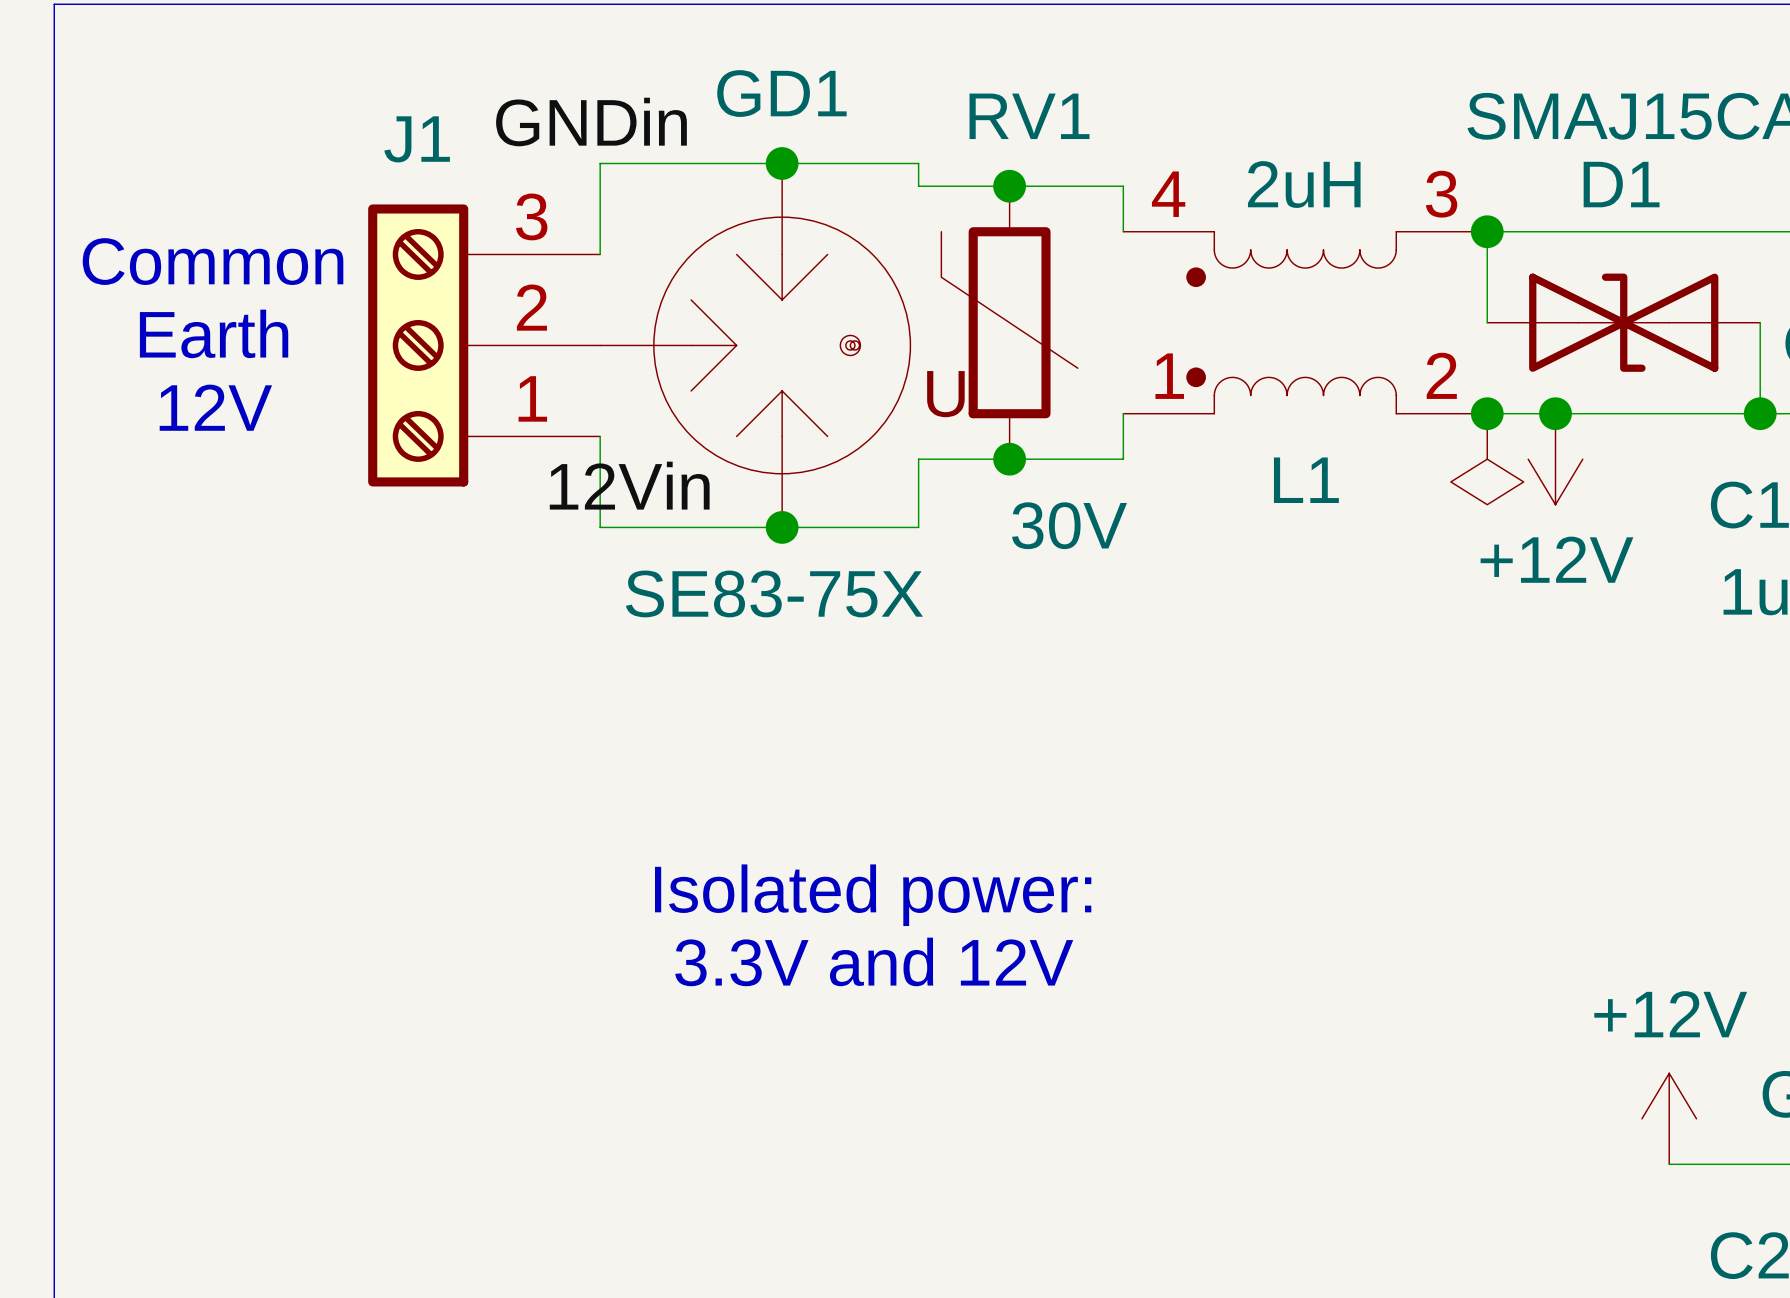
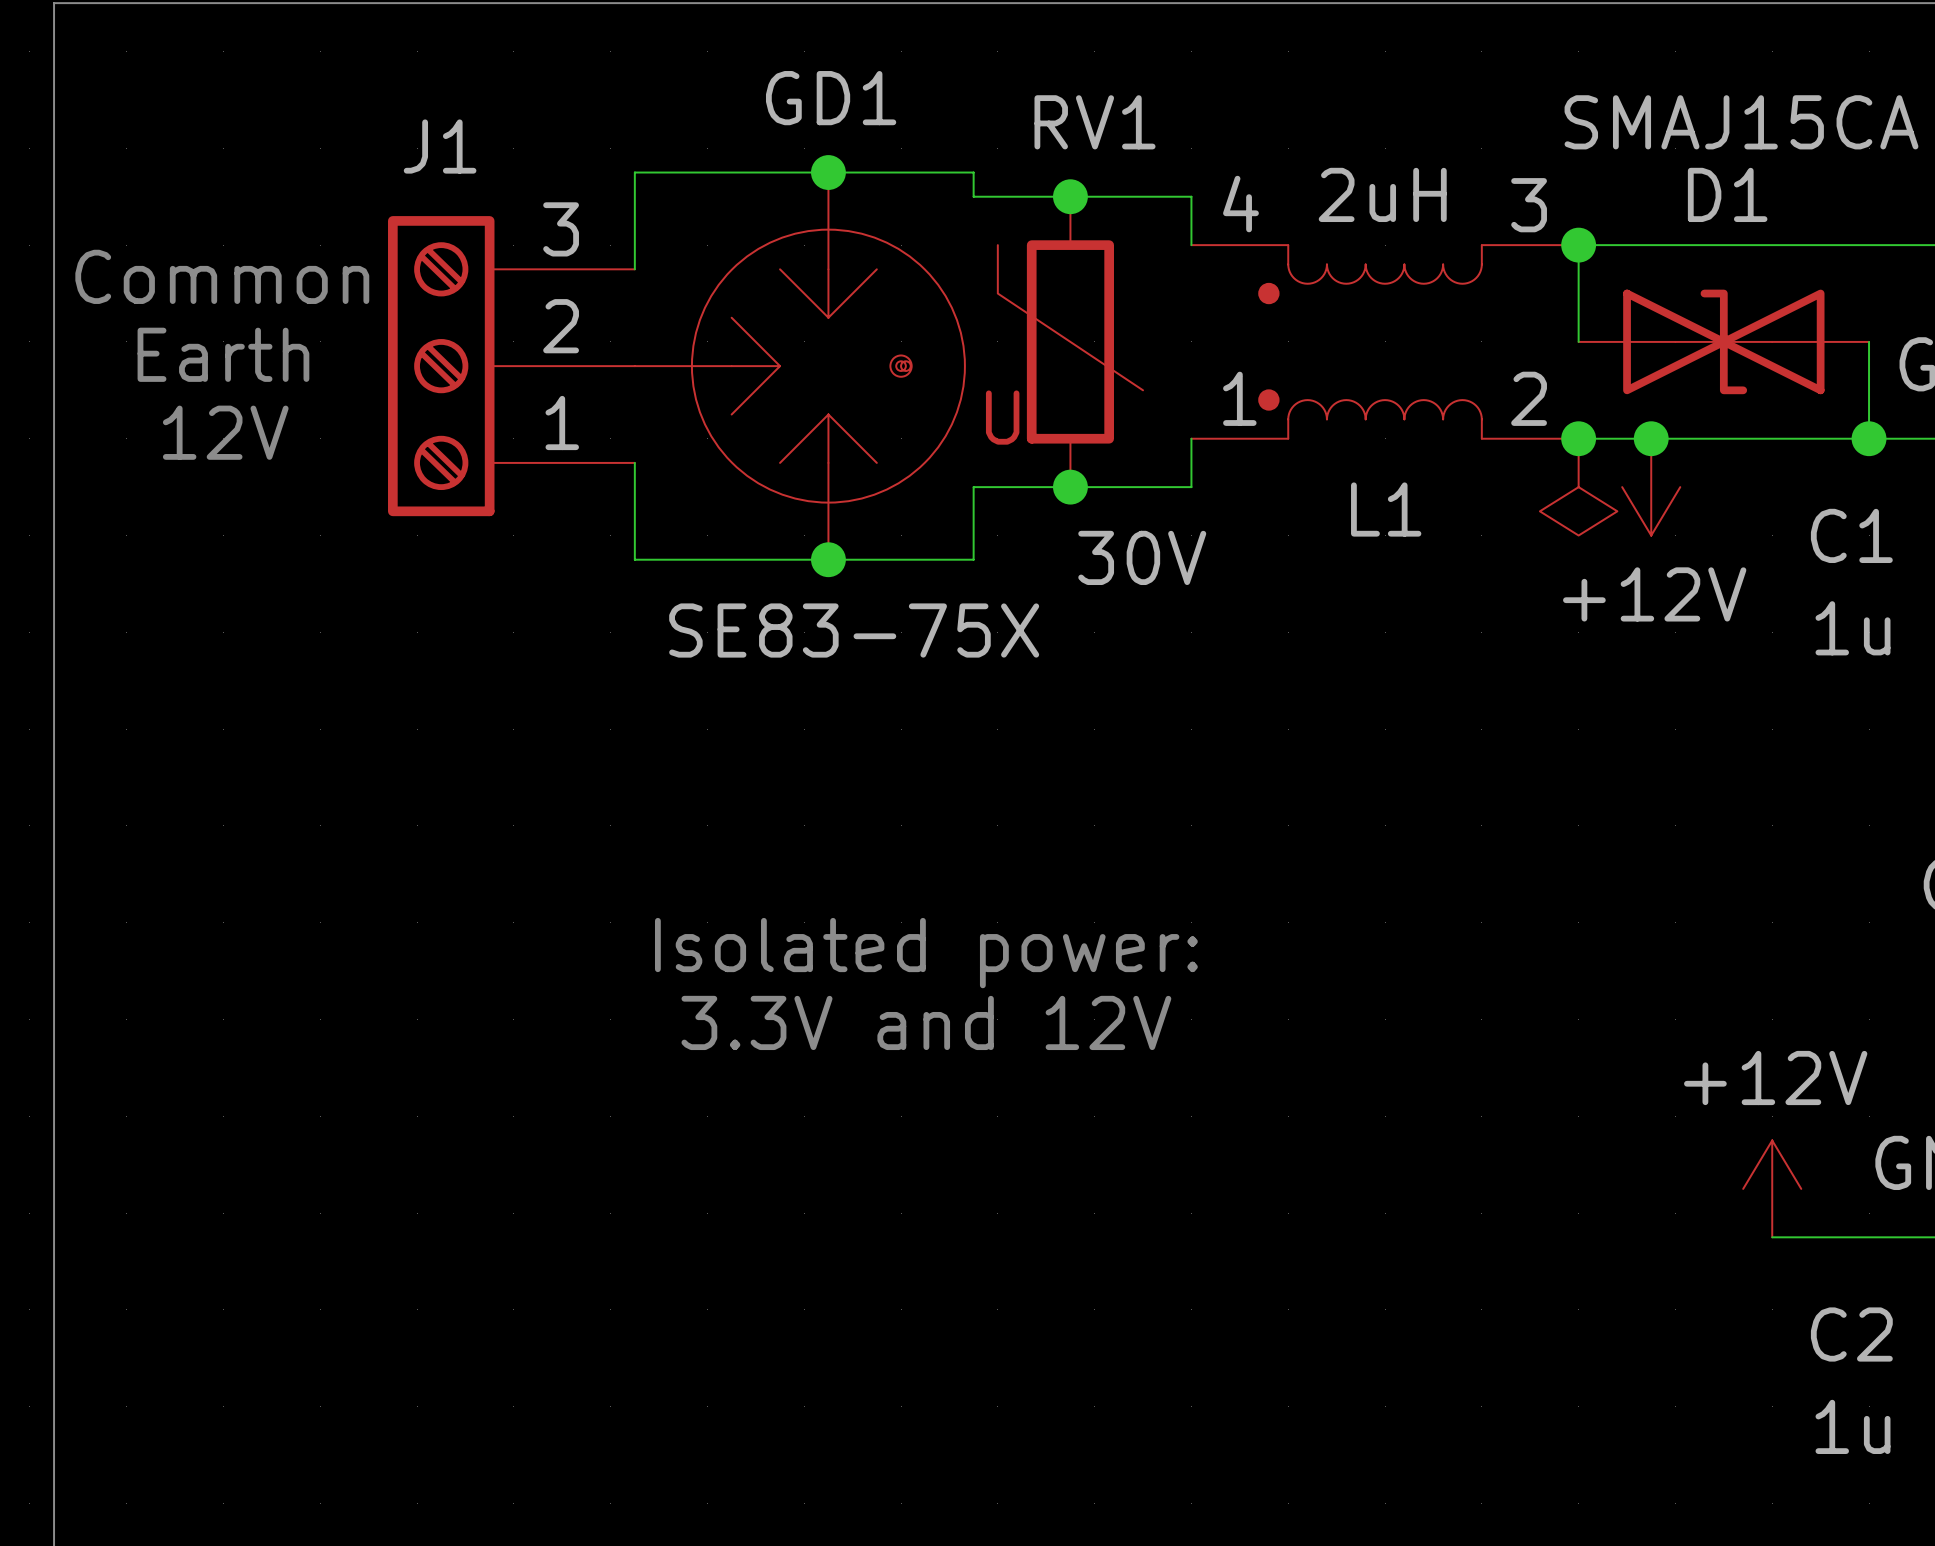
label: GNDin (591, 122) -> none
label: 12Vin (629, 485) -> none

